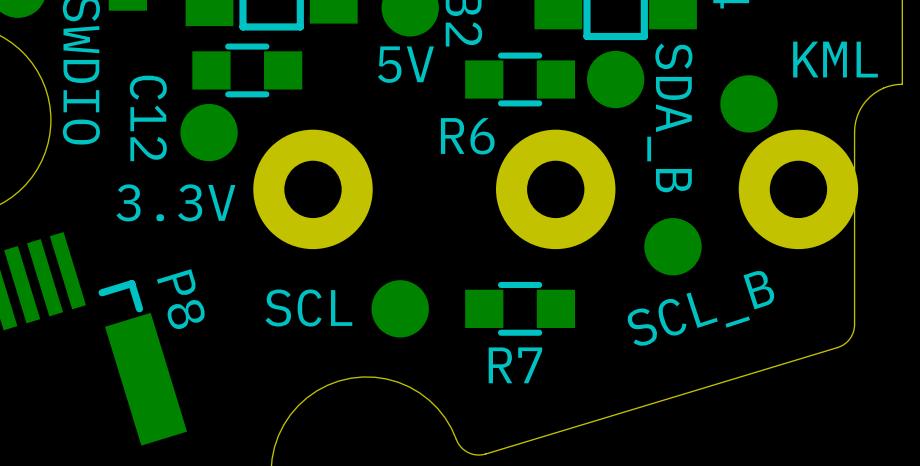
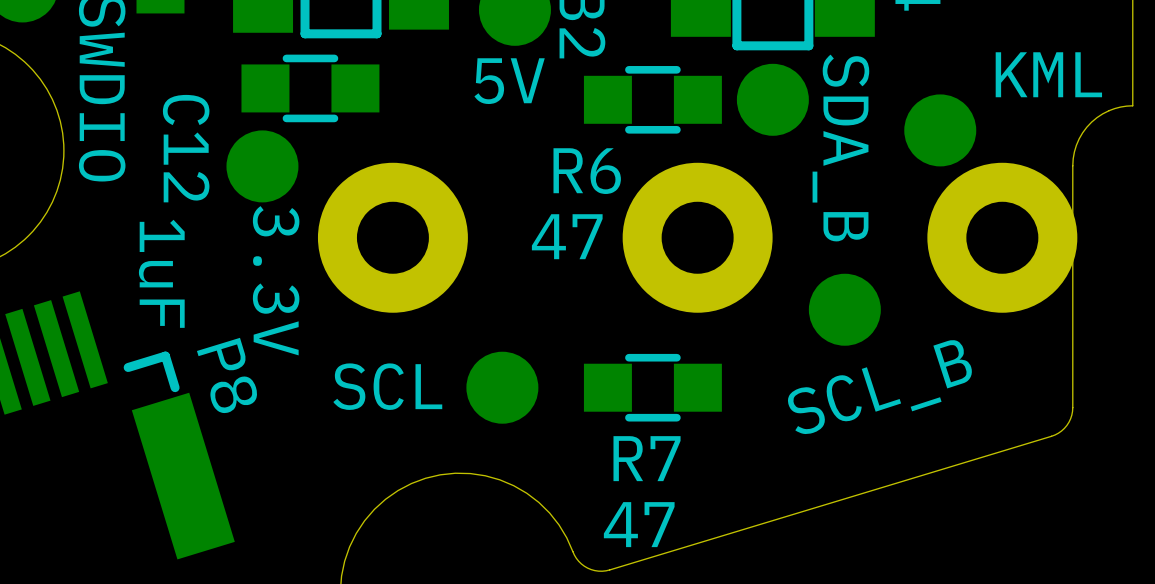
R6 value: none -> 47 (567, 236)
part value rotation: 0° (175, 202) -> 90° clockwise (276, 280)
C12 value: none -> 1uF (161, 273)
R7 value: none -> 47 (639, 524)

